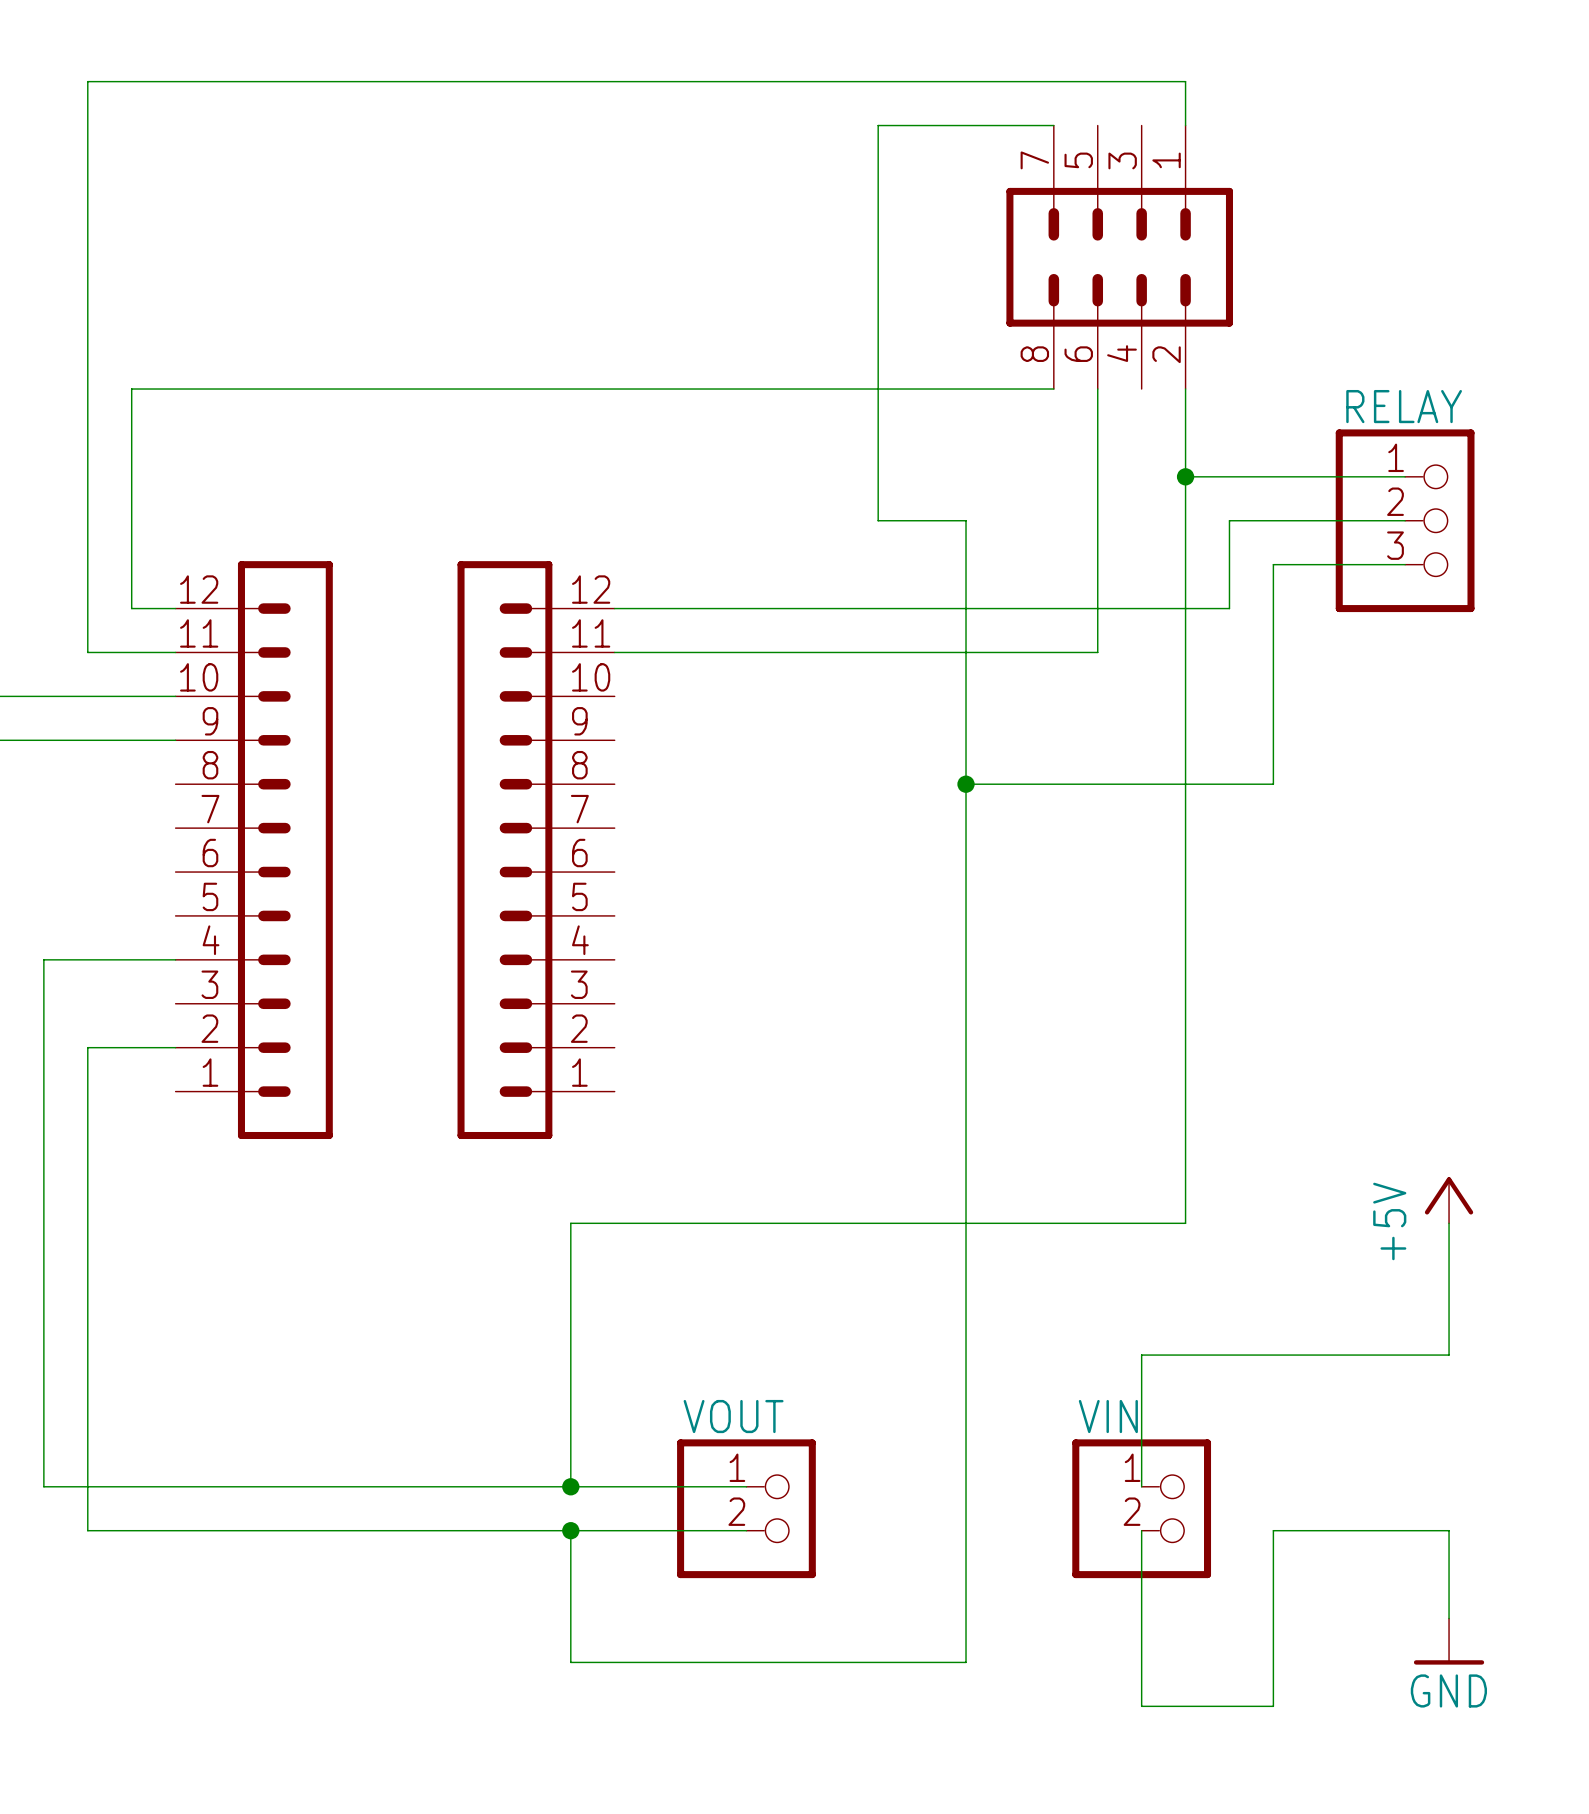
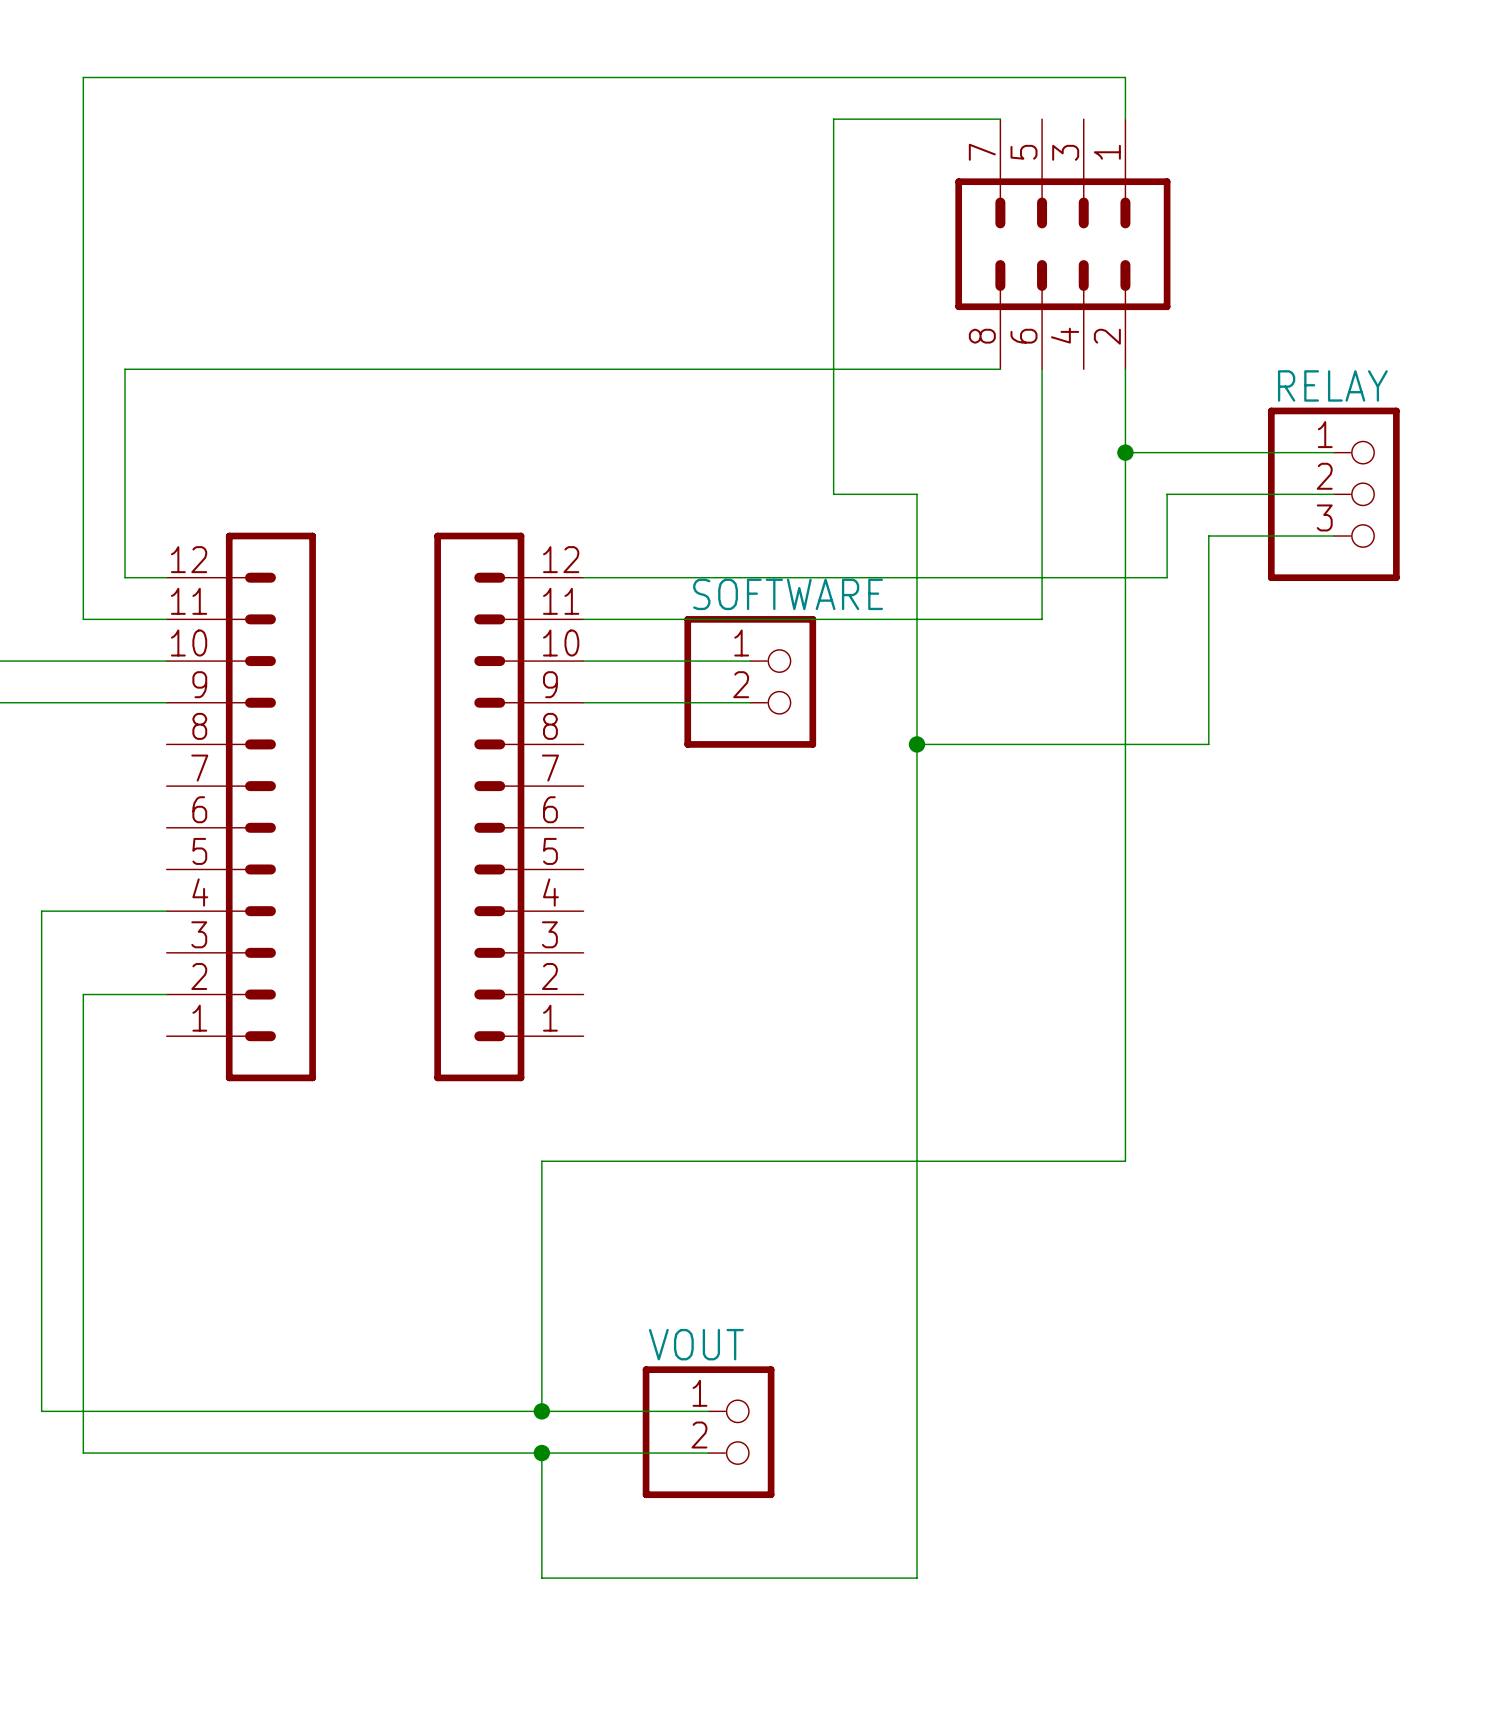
wire: none -> (583, 661) (750, 661)
SOFTWARE: none -> (750, 681)
wire: none -> (583, 702) (750, 702)
power symbol: +5V (1449, 1200) -> none
wire: (1449, 1223) (1449, 1355) (1141, 1355) (1141, 1486) -> none
VIN: (1141, 1508) -> none
wire: (1141, 1530) (1141, 1706) (1273, 1706) (1273, 1530) (1449, 1530) (1449, 1618) -> none
power symbol: GND (1449, 1641) -> none

